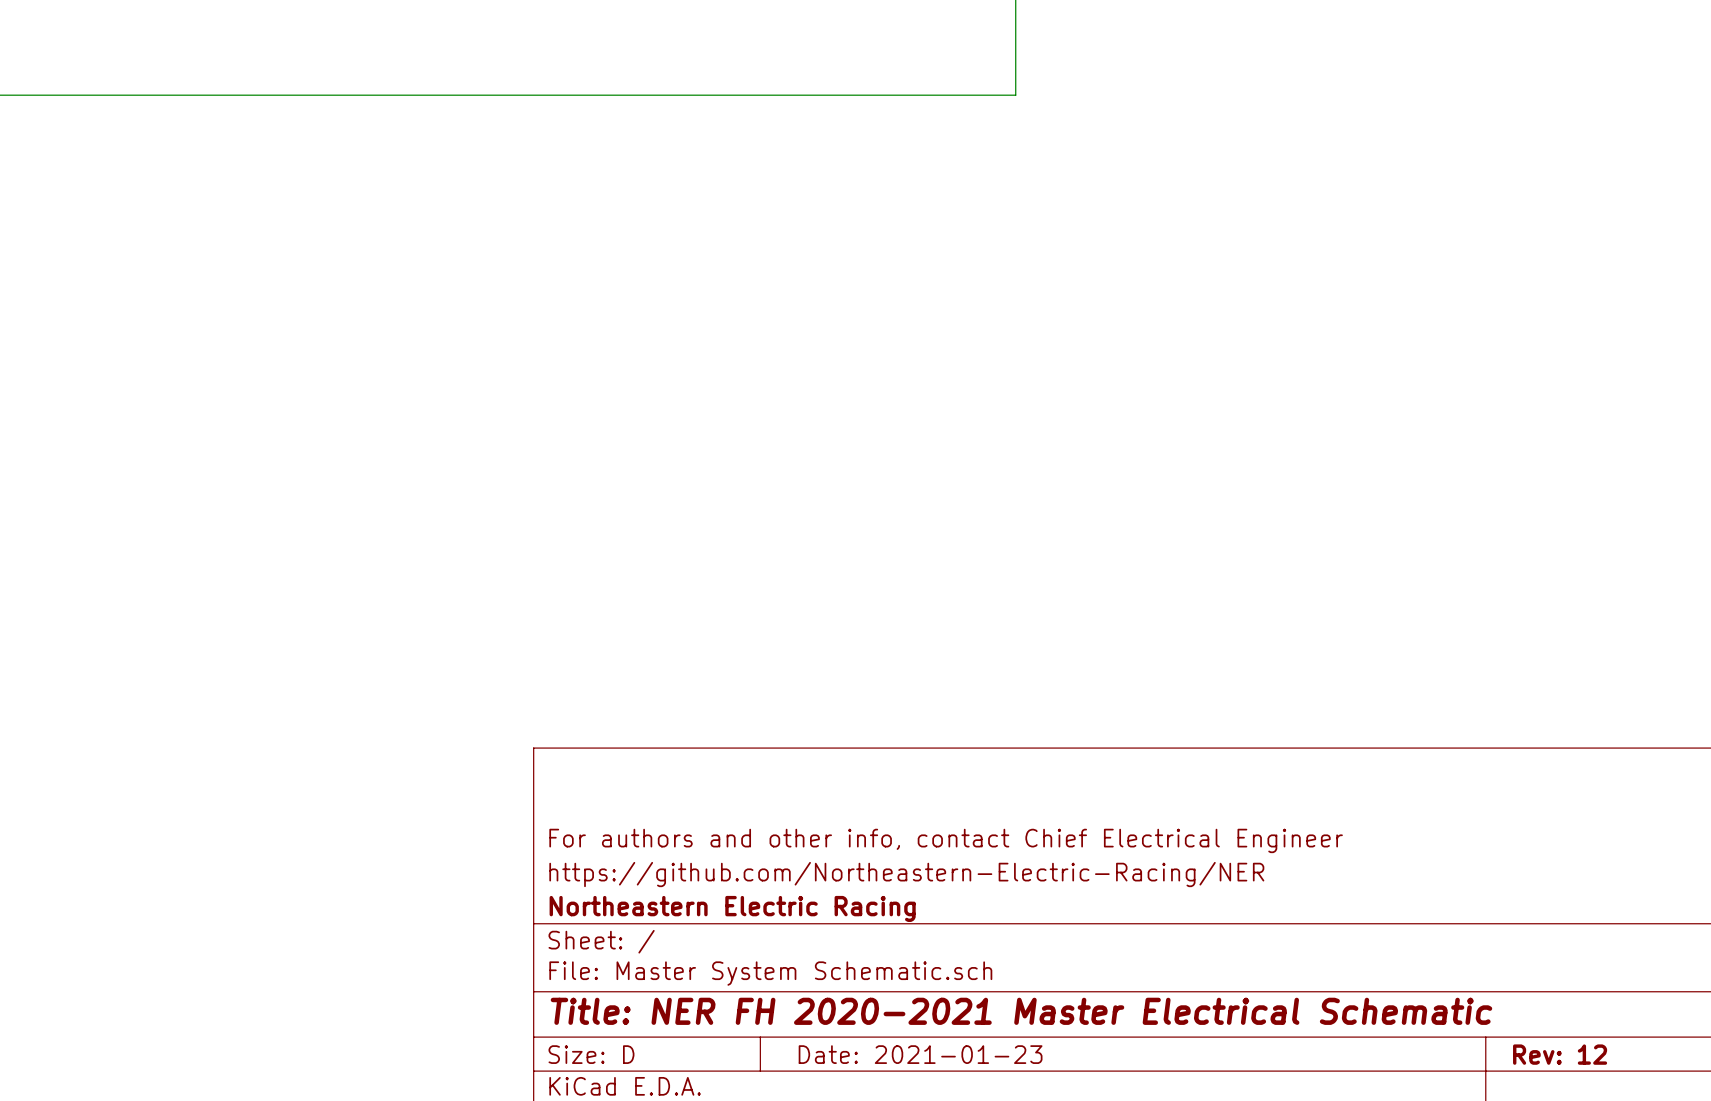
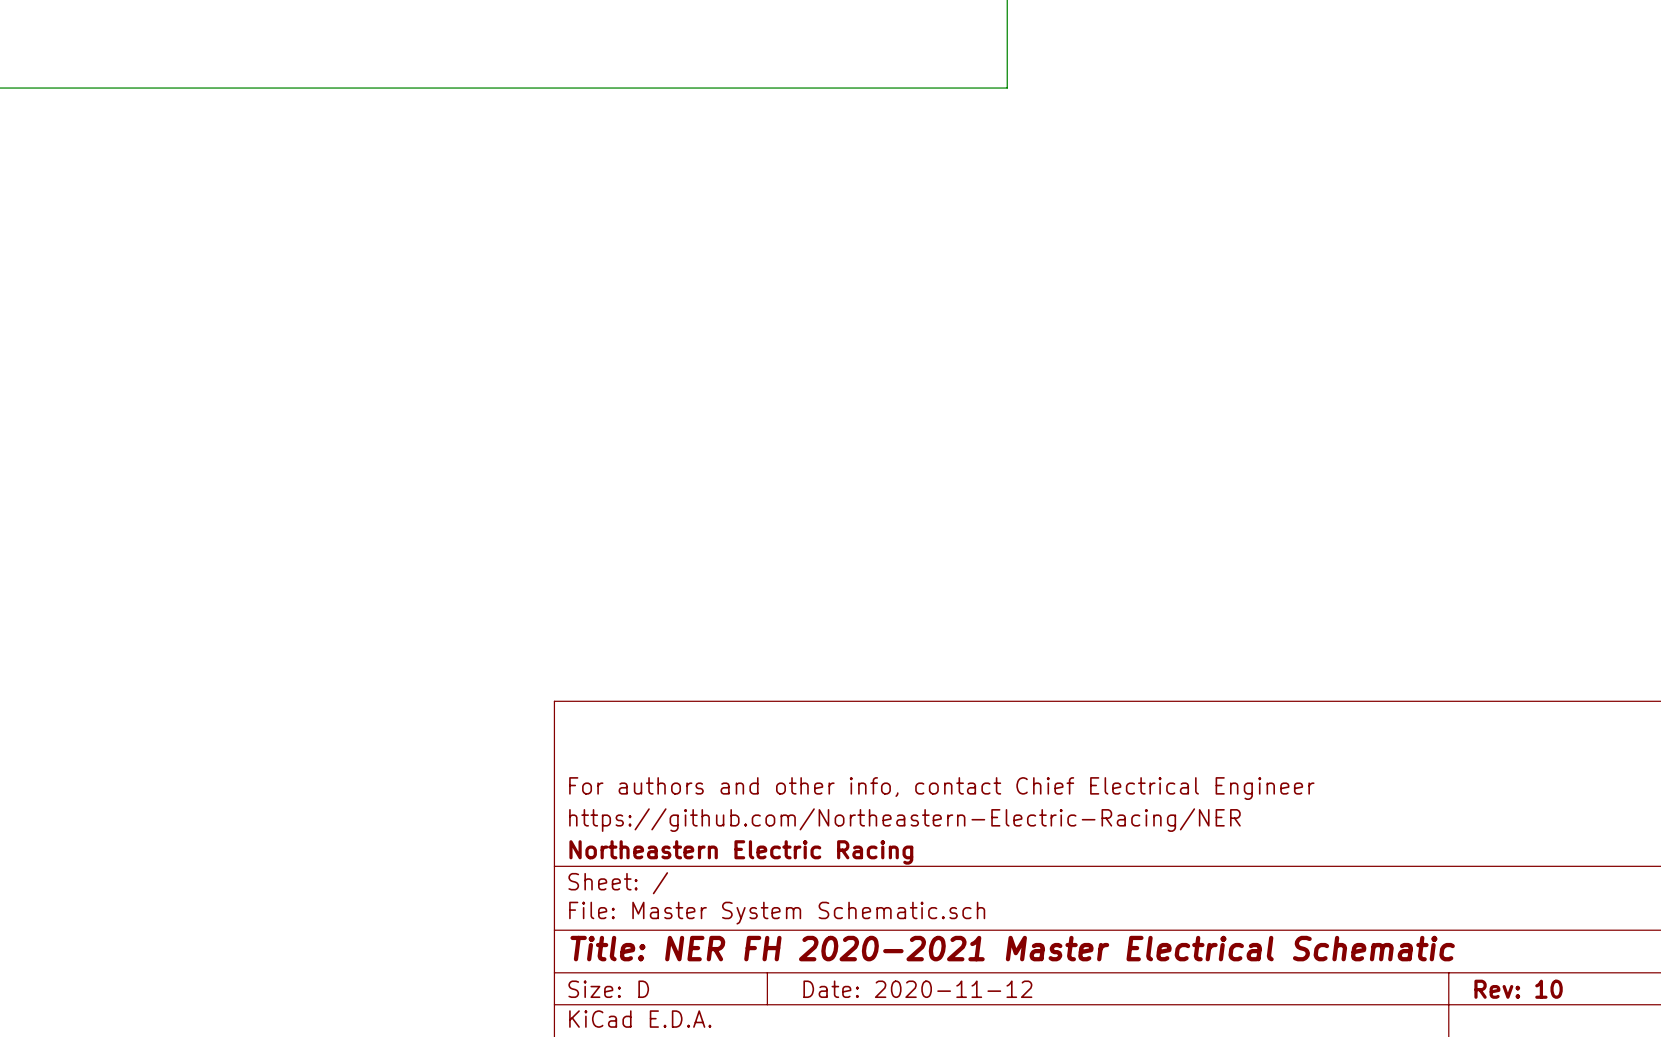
title block: Date: 2021-01-23 (920, 1054) -> Date: 2020-11-12 (917, 989)
title block: Rev: 12 (1560, 1054) -> Rev: 10 (1518, 989)

